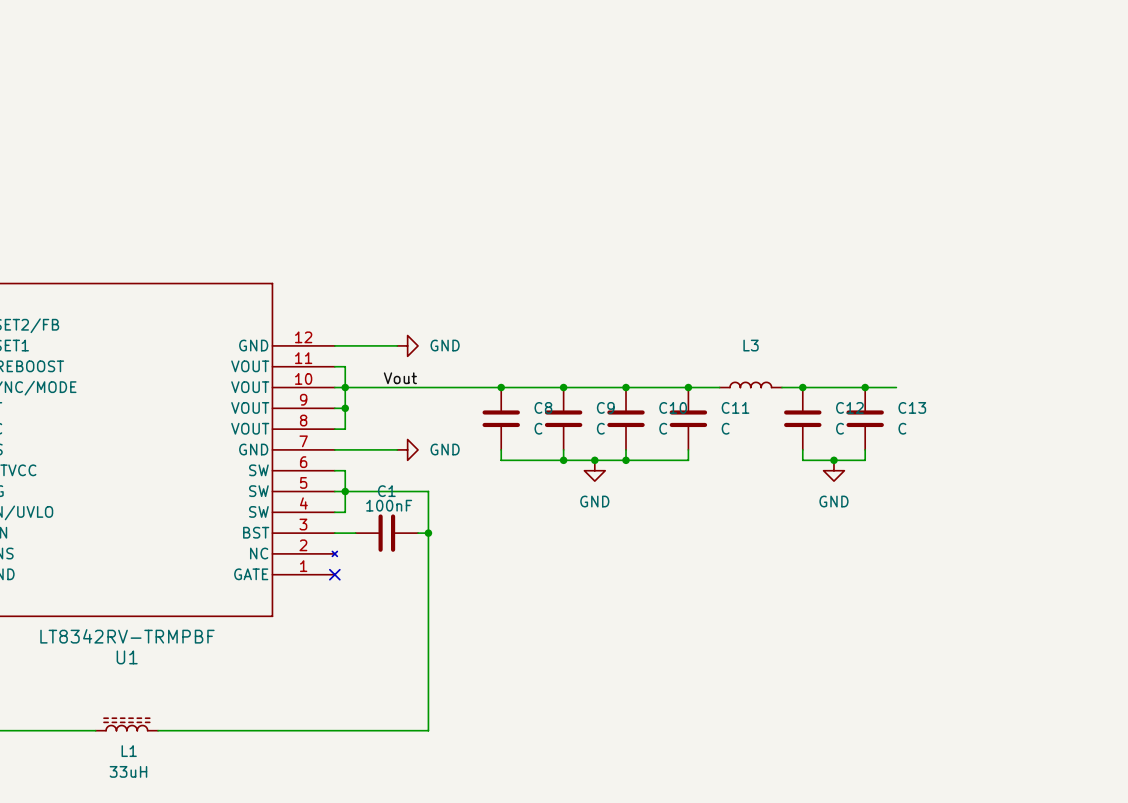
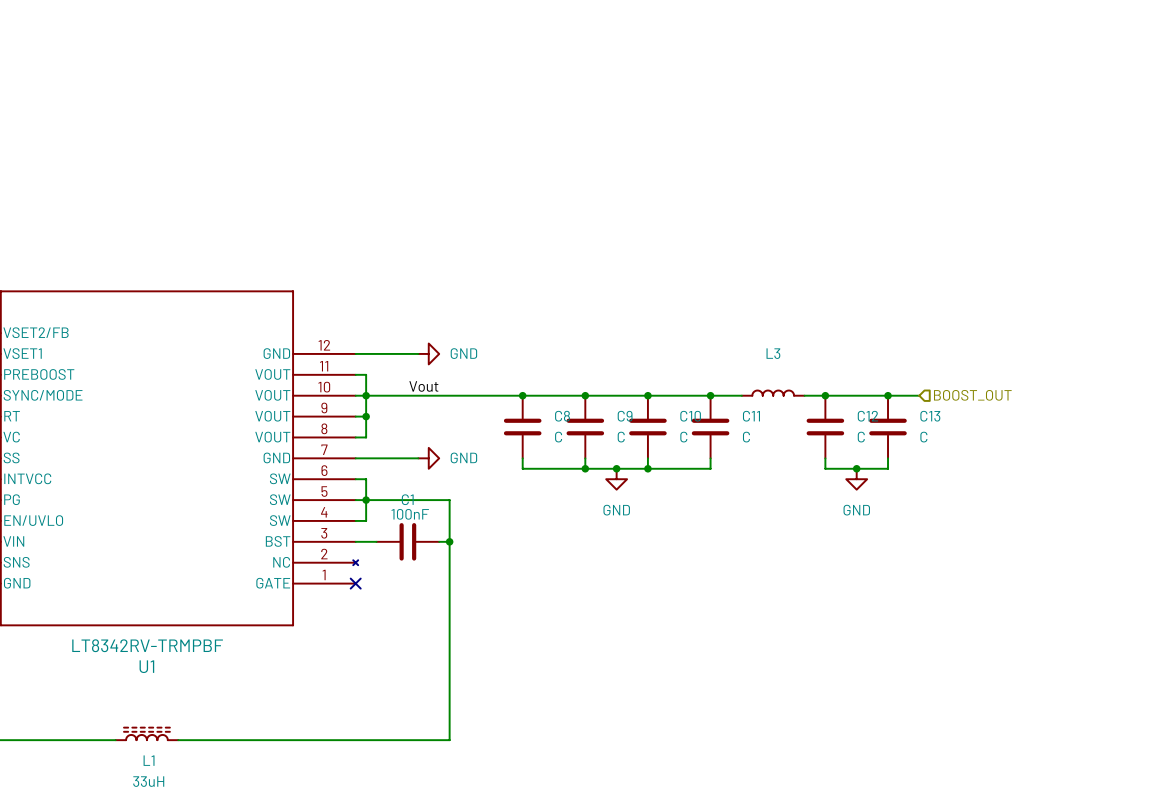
hierarchical label: none -> BOOST_OUT (972, 395)

